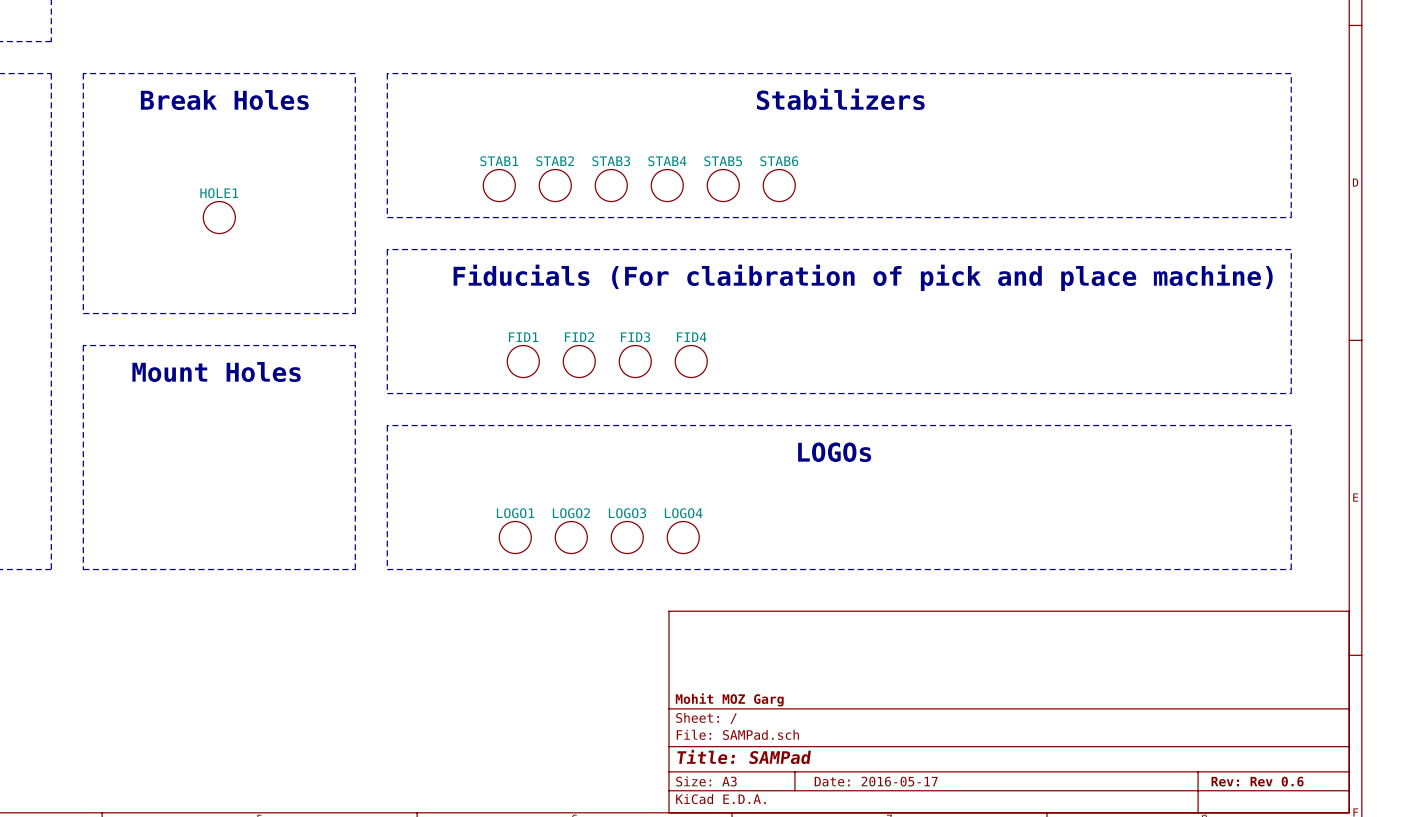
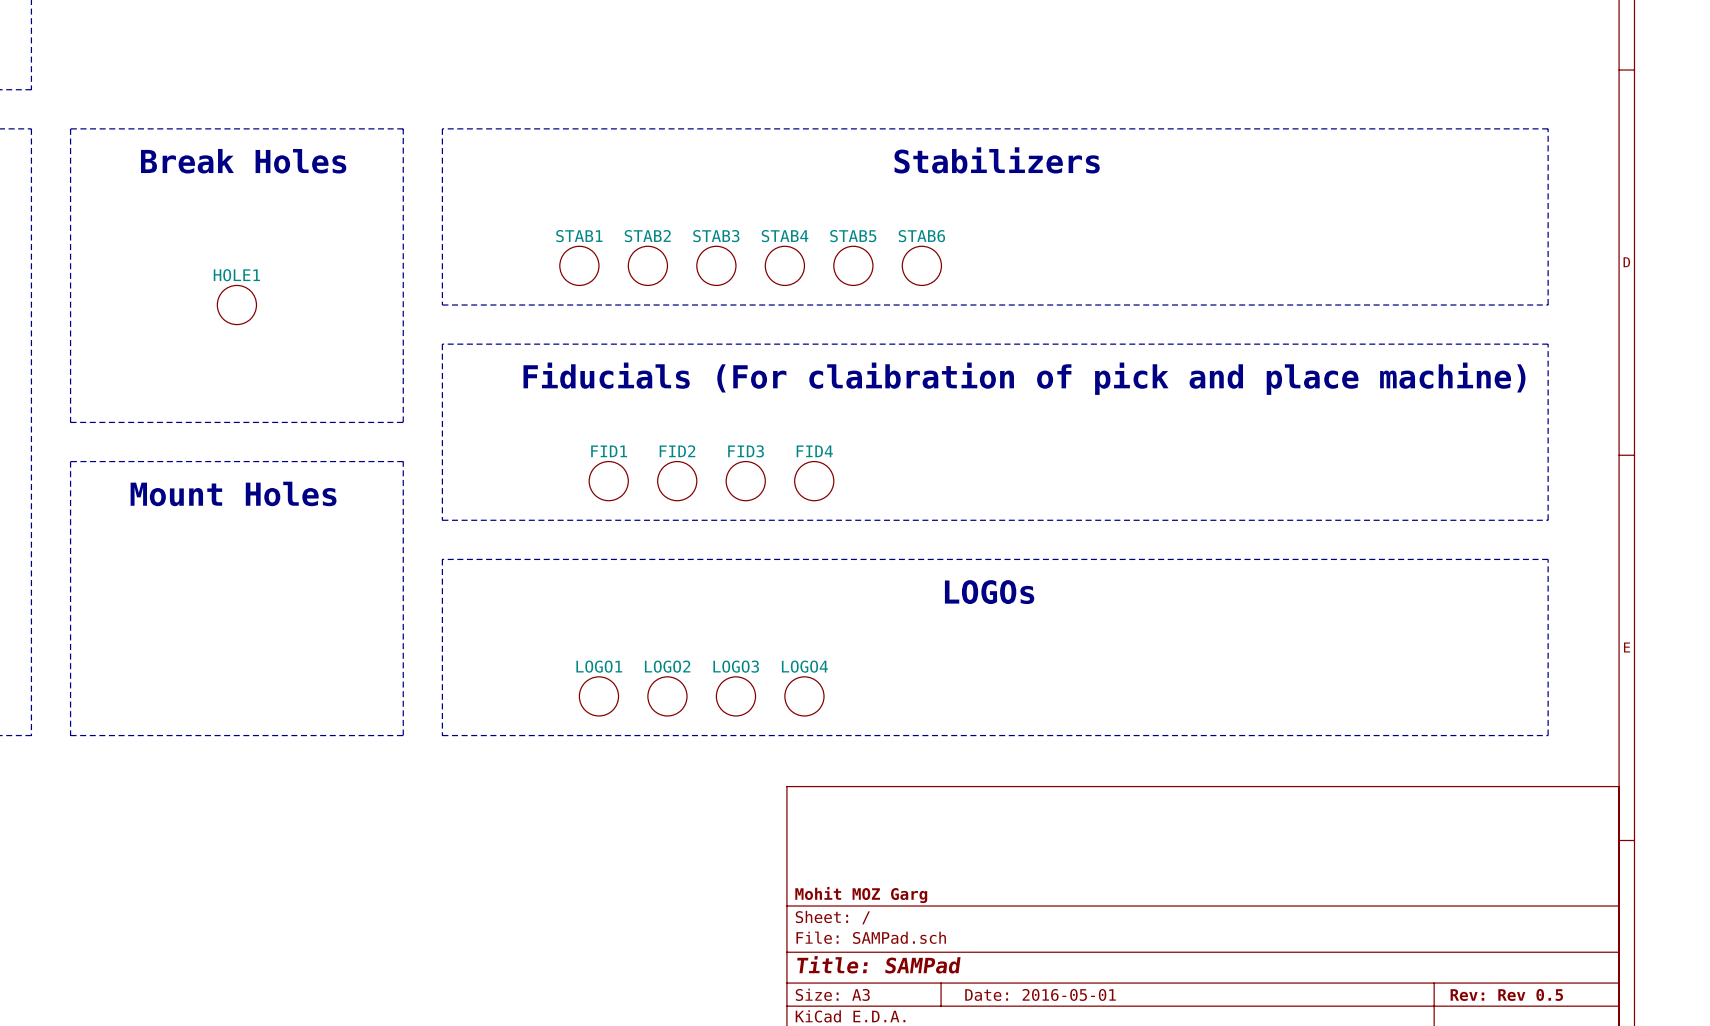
title block: Date: 2016-05-17 (876, 781) -> Date: 2016-05-01 (1040, 994)
title block: Rev: Rev 0.6 (1257, 781) -> Rev: Rev 0.5 (1506, 994)

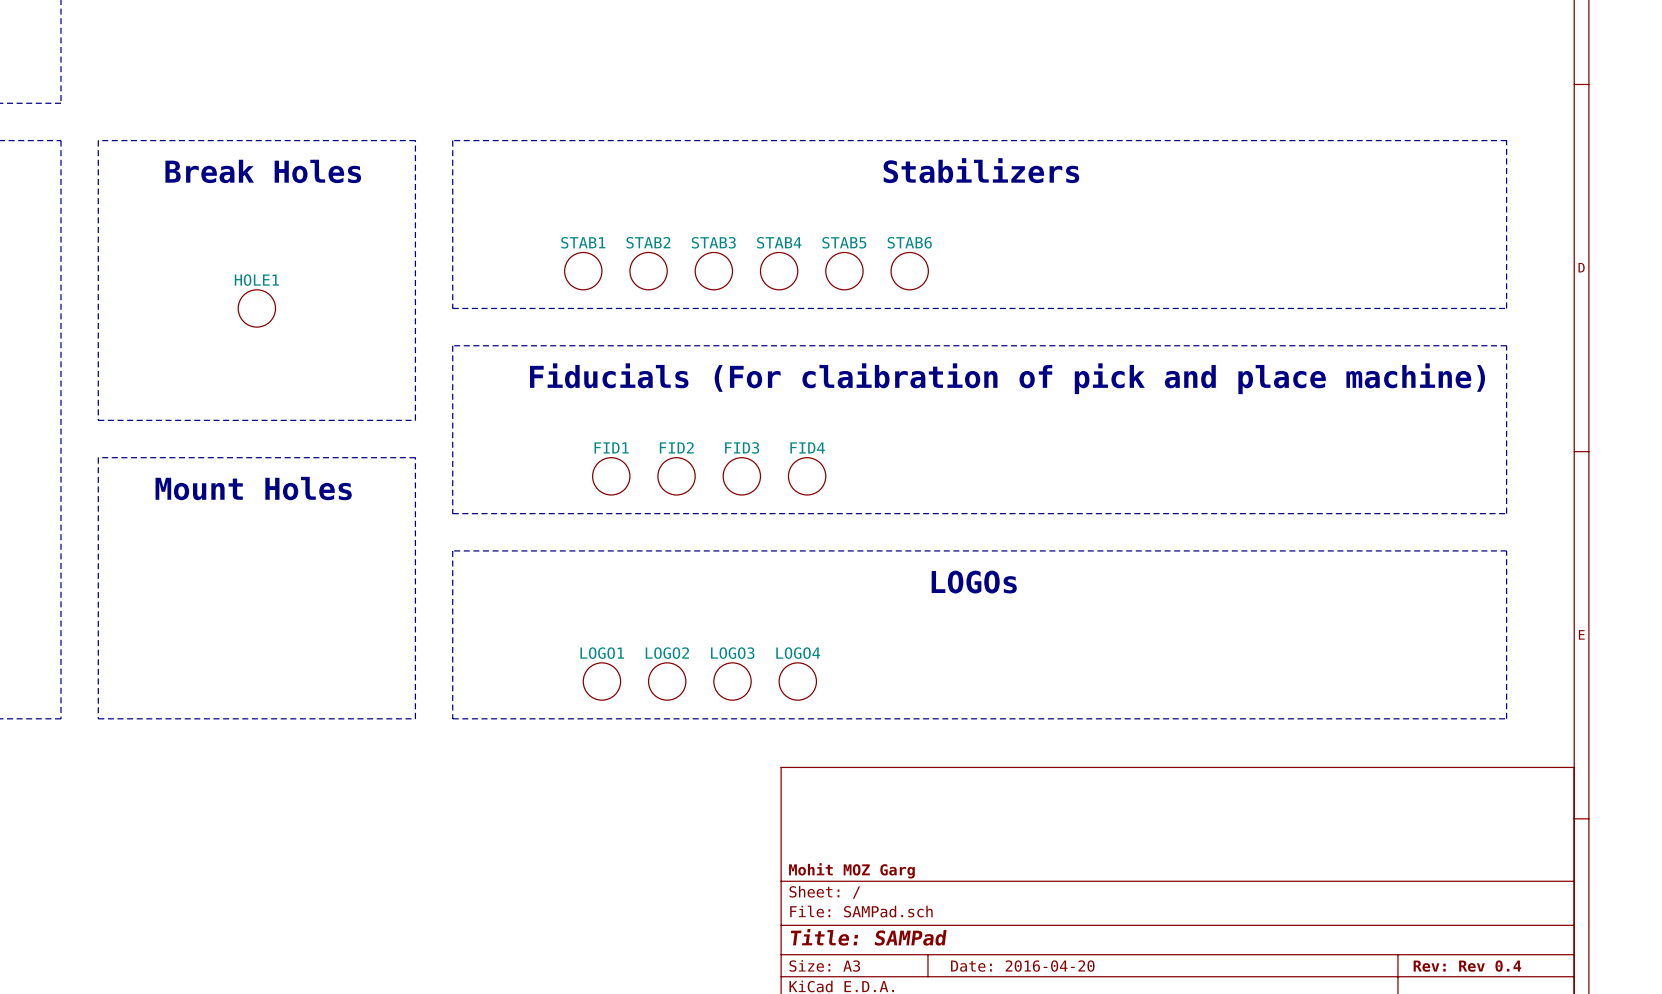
title block: Date: 2016-05-01 (1040, 994) -> Date: 2016-04-20 (1022, 966)
title block: Rev: Rev 0.5 (1506, 994) -> Rev: Rev 0.4 (1467, 966)

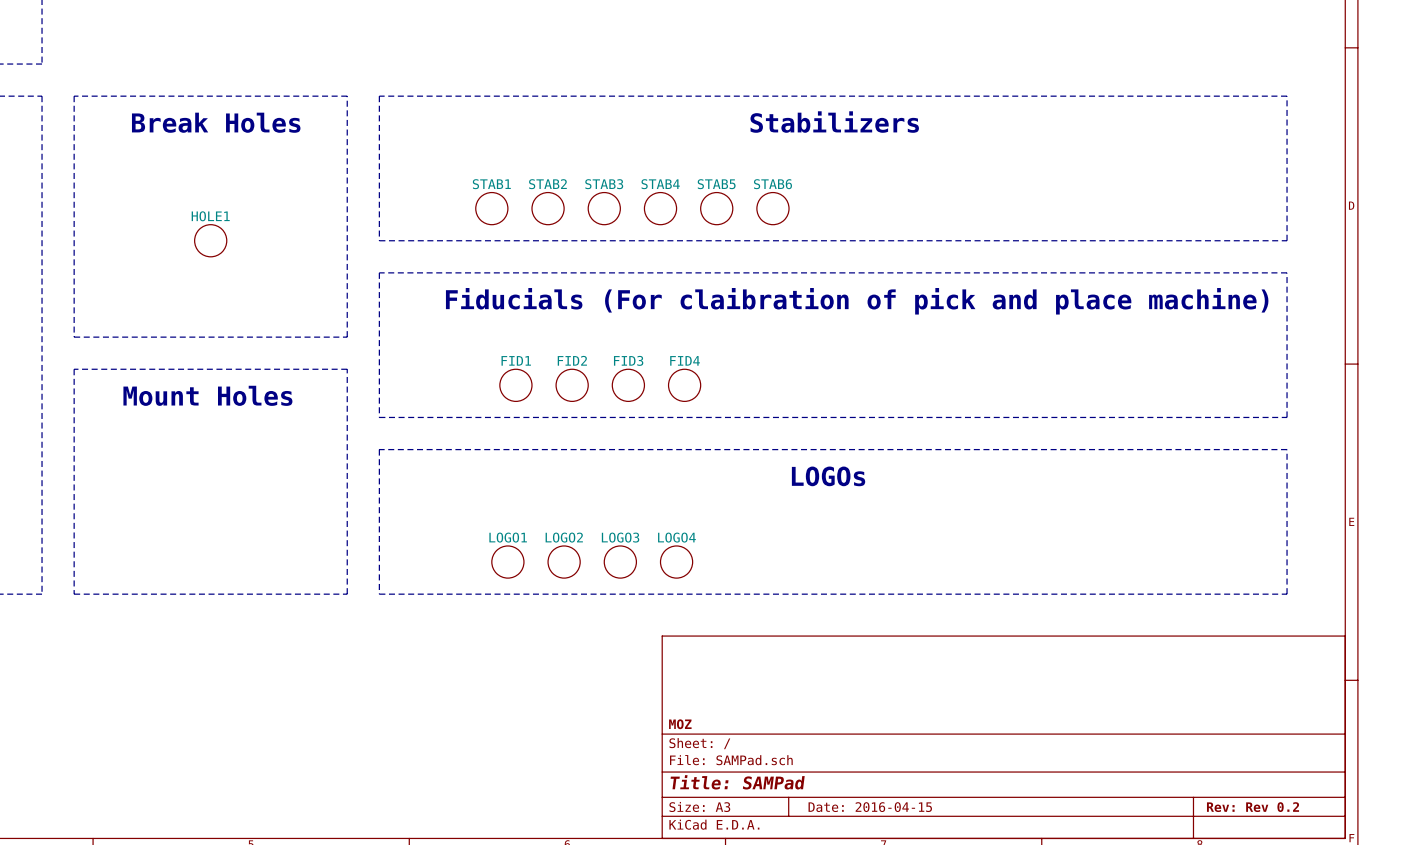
title block: Mohit MOZ Garg (851, 870) -> MOZ (680, 724)
title block: Date: 2016-04-20 (1022, 966) -> Date: 2016-04-15 (870, 807)
title block: Rev: Rev 0.4 (1467, 966) -> Rev: Rev 0.2 (1253, 807)

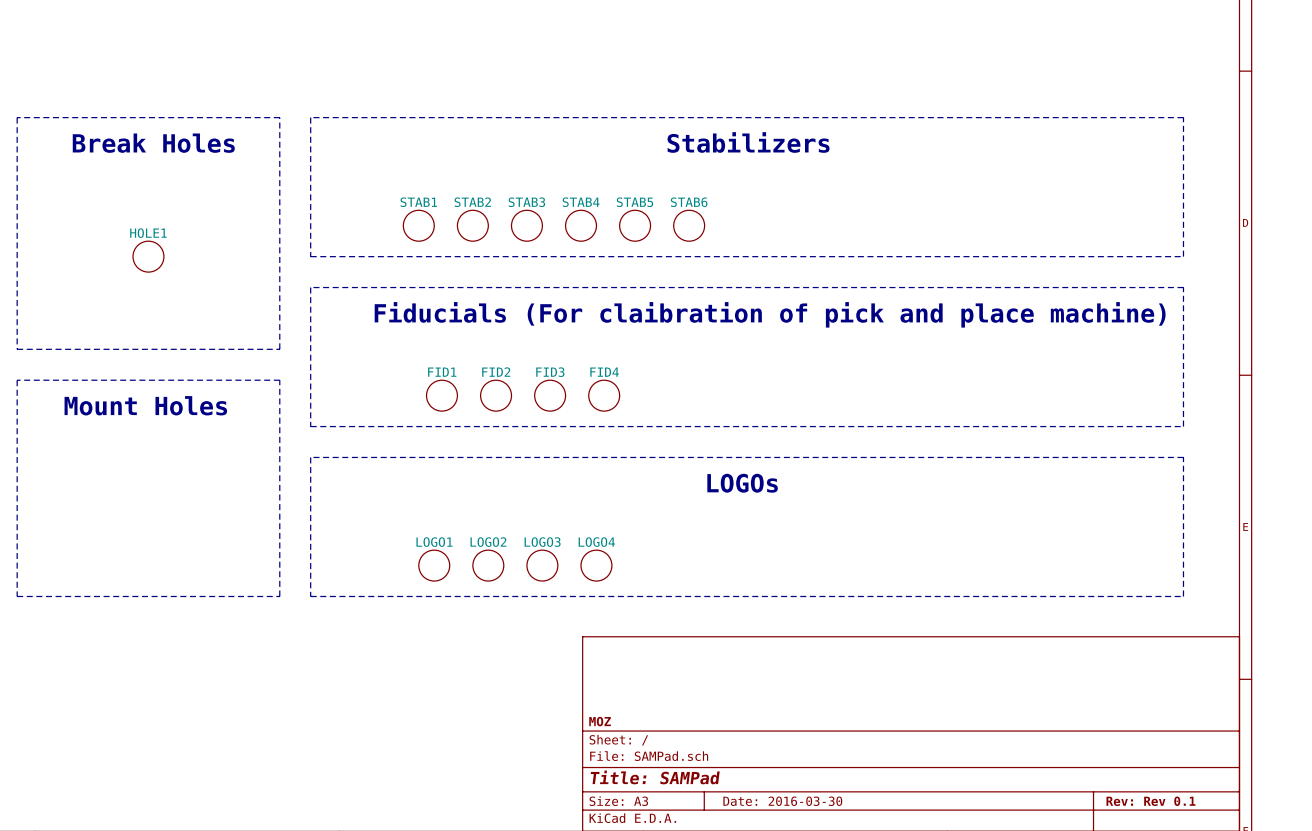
title block: Date: 2016-04-15 (870, 807) -> Date: 2016-03-30 (782, 801)
title block: Rev: Rev 0.2 (1253, 807) -> Rev: Rev 0.1 (1150, 801)

